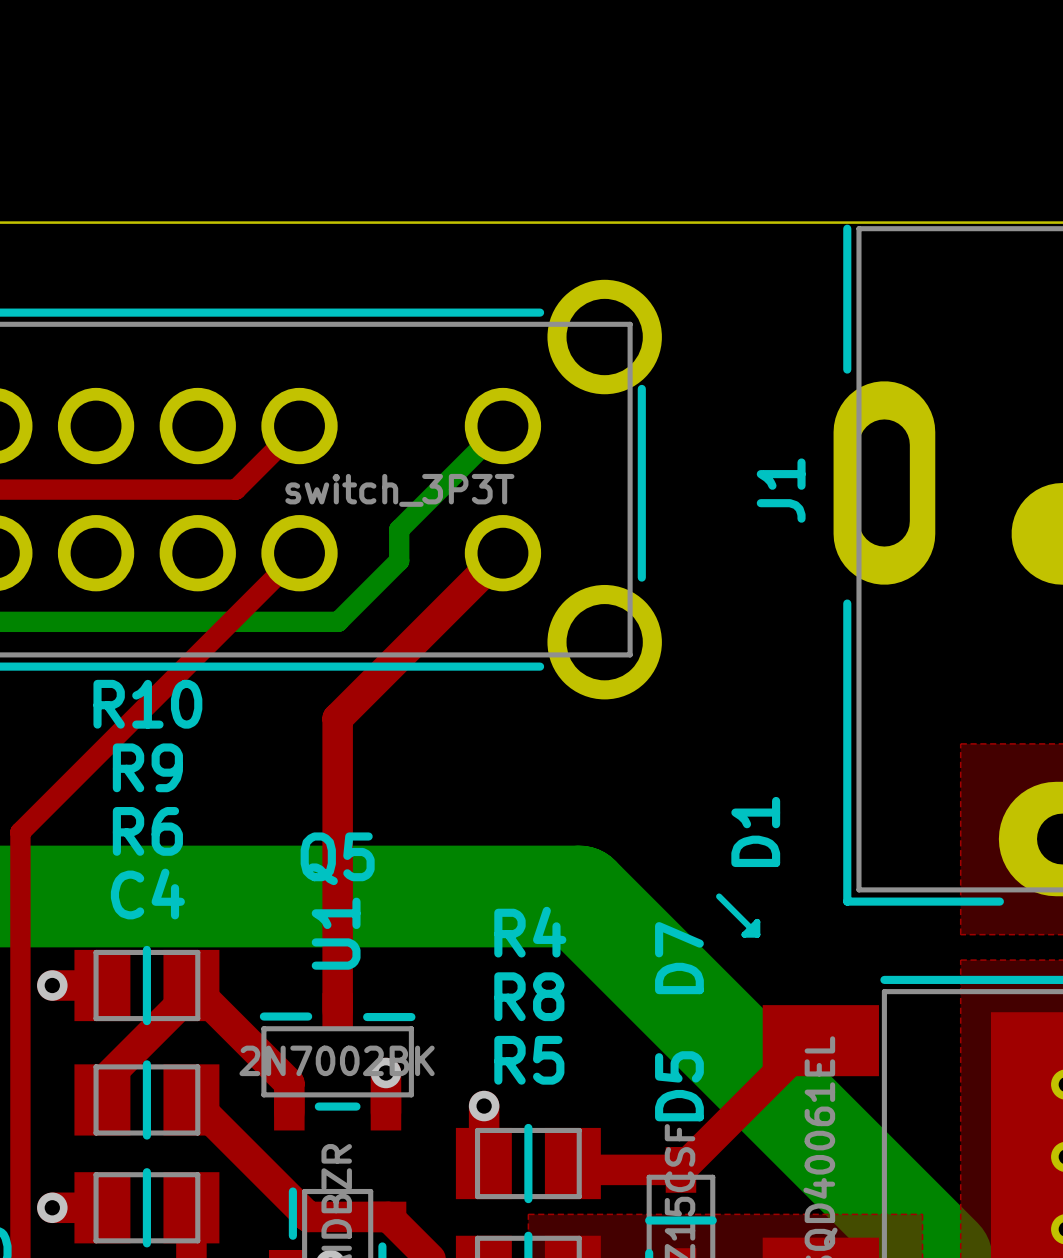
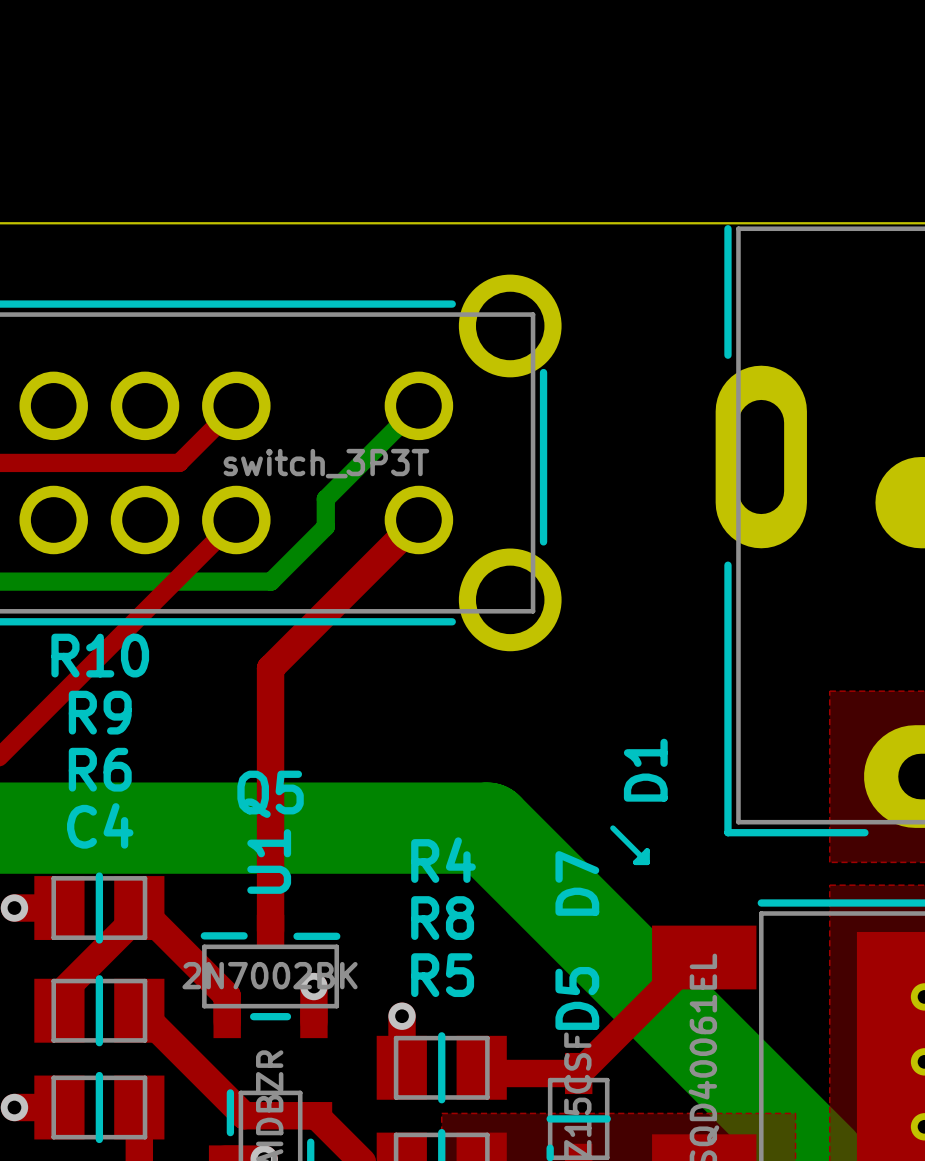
J1 name: J1 (781, 490) -> none

